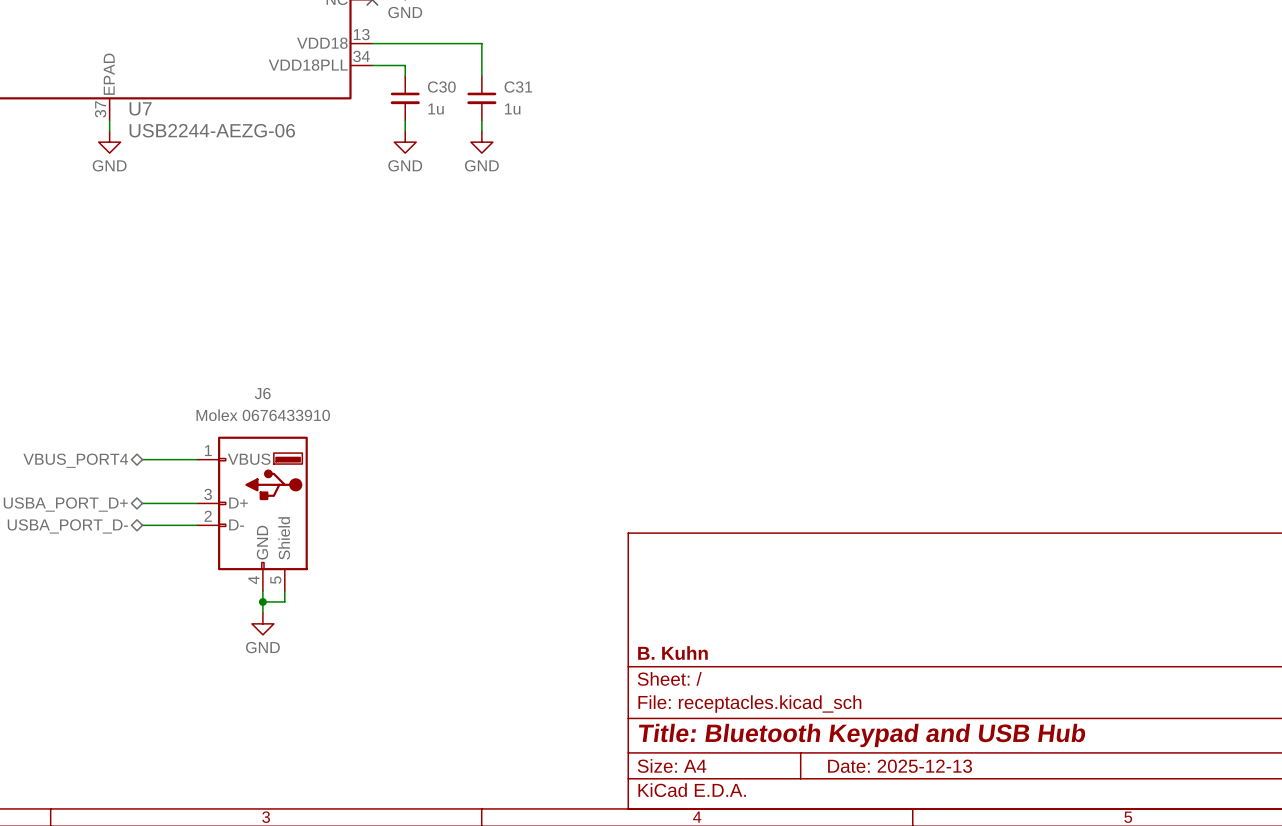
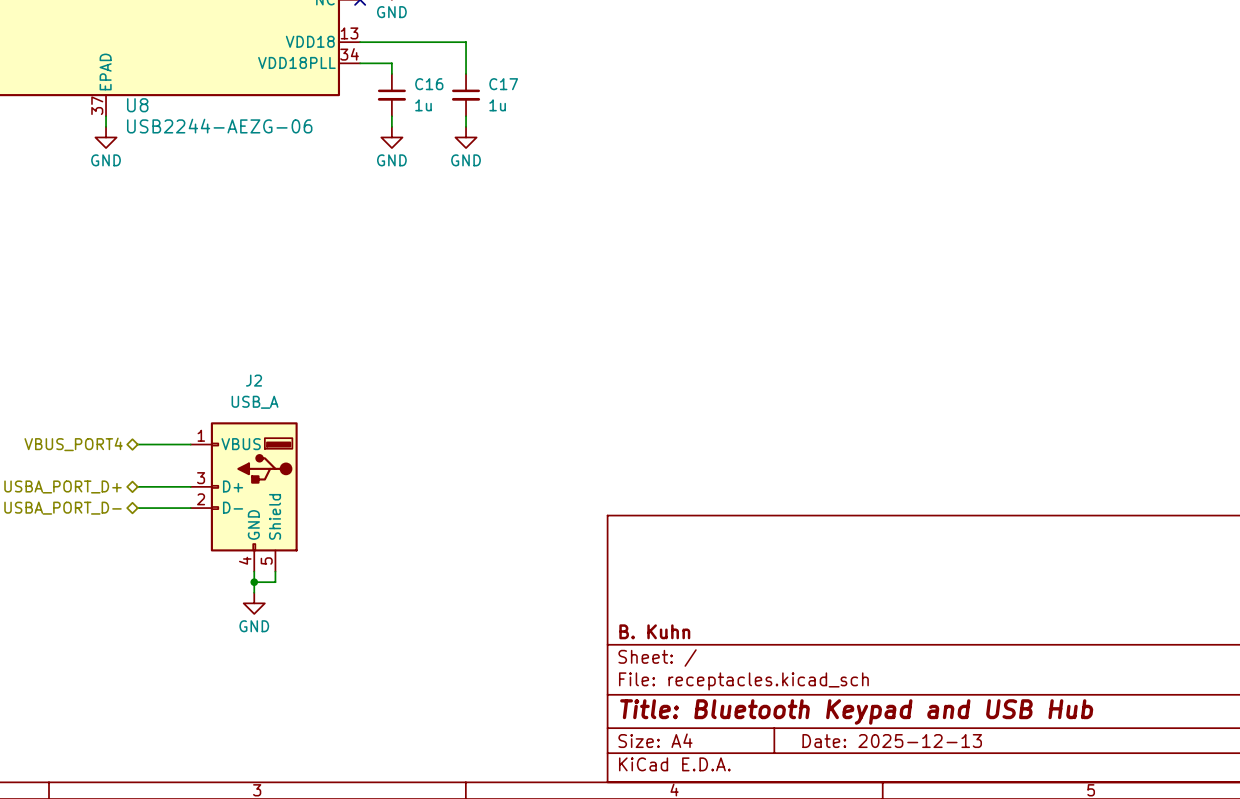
C30 name: C30 (441, 87) -> C16 (429, 84)
C31 name: C31 (518, 87) -> C17 (503, 84)
U7 name: U7 (140, 108) -> U8 (137, 105)
J6 name: J6 (262, 393) -> J2 (254, 380)
J6 value: Molex 0676433910 (263, 415) -> USB_A (255, 402)

